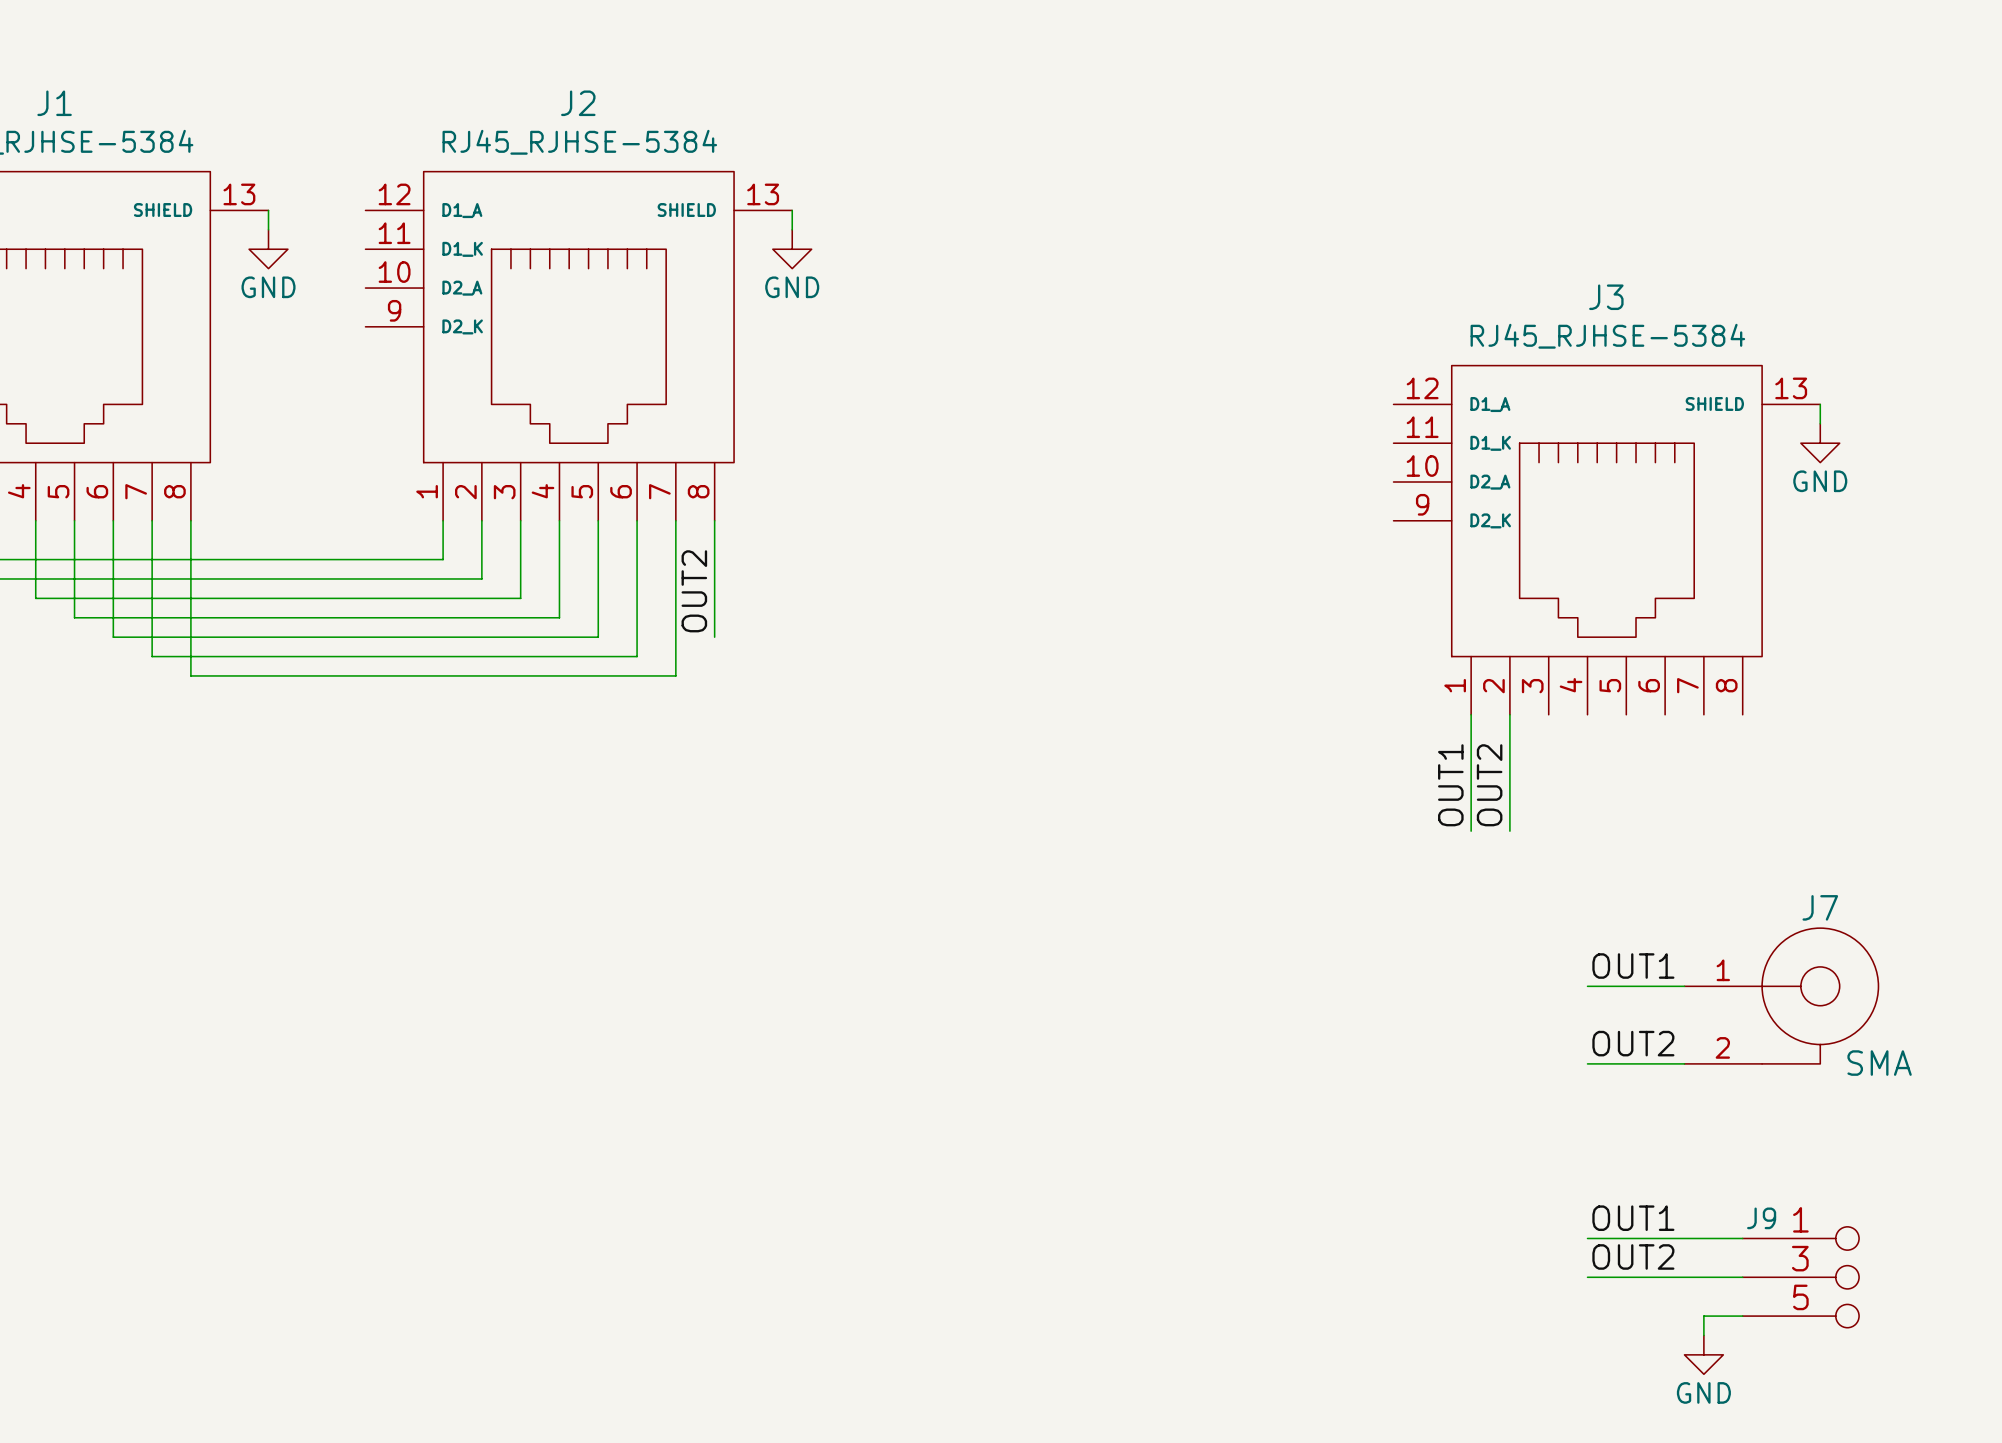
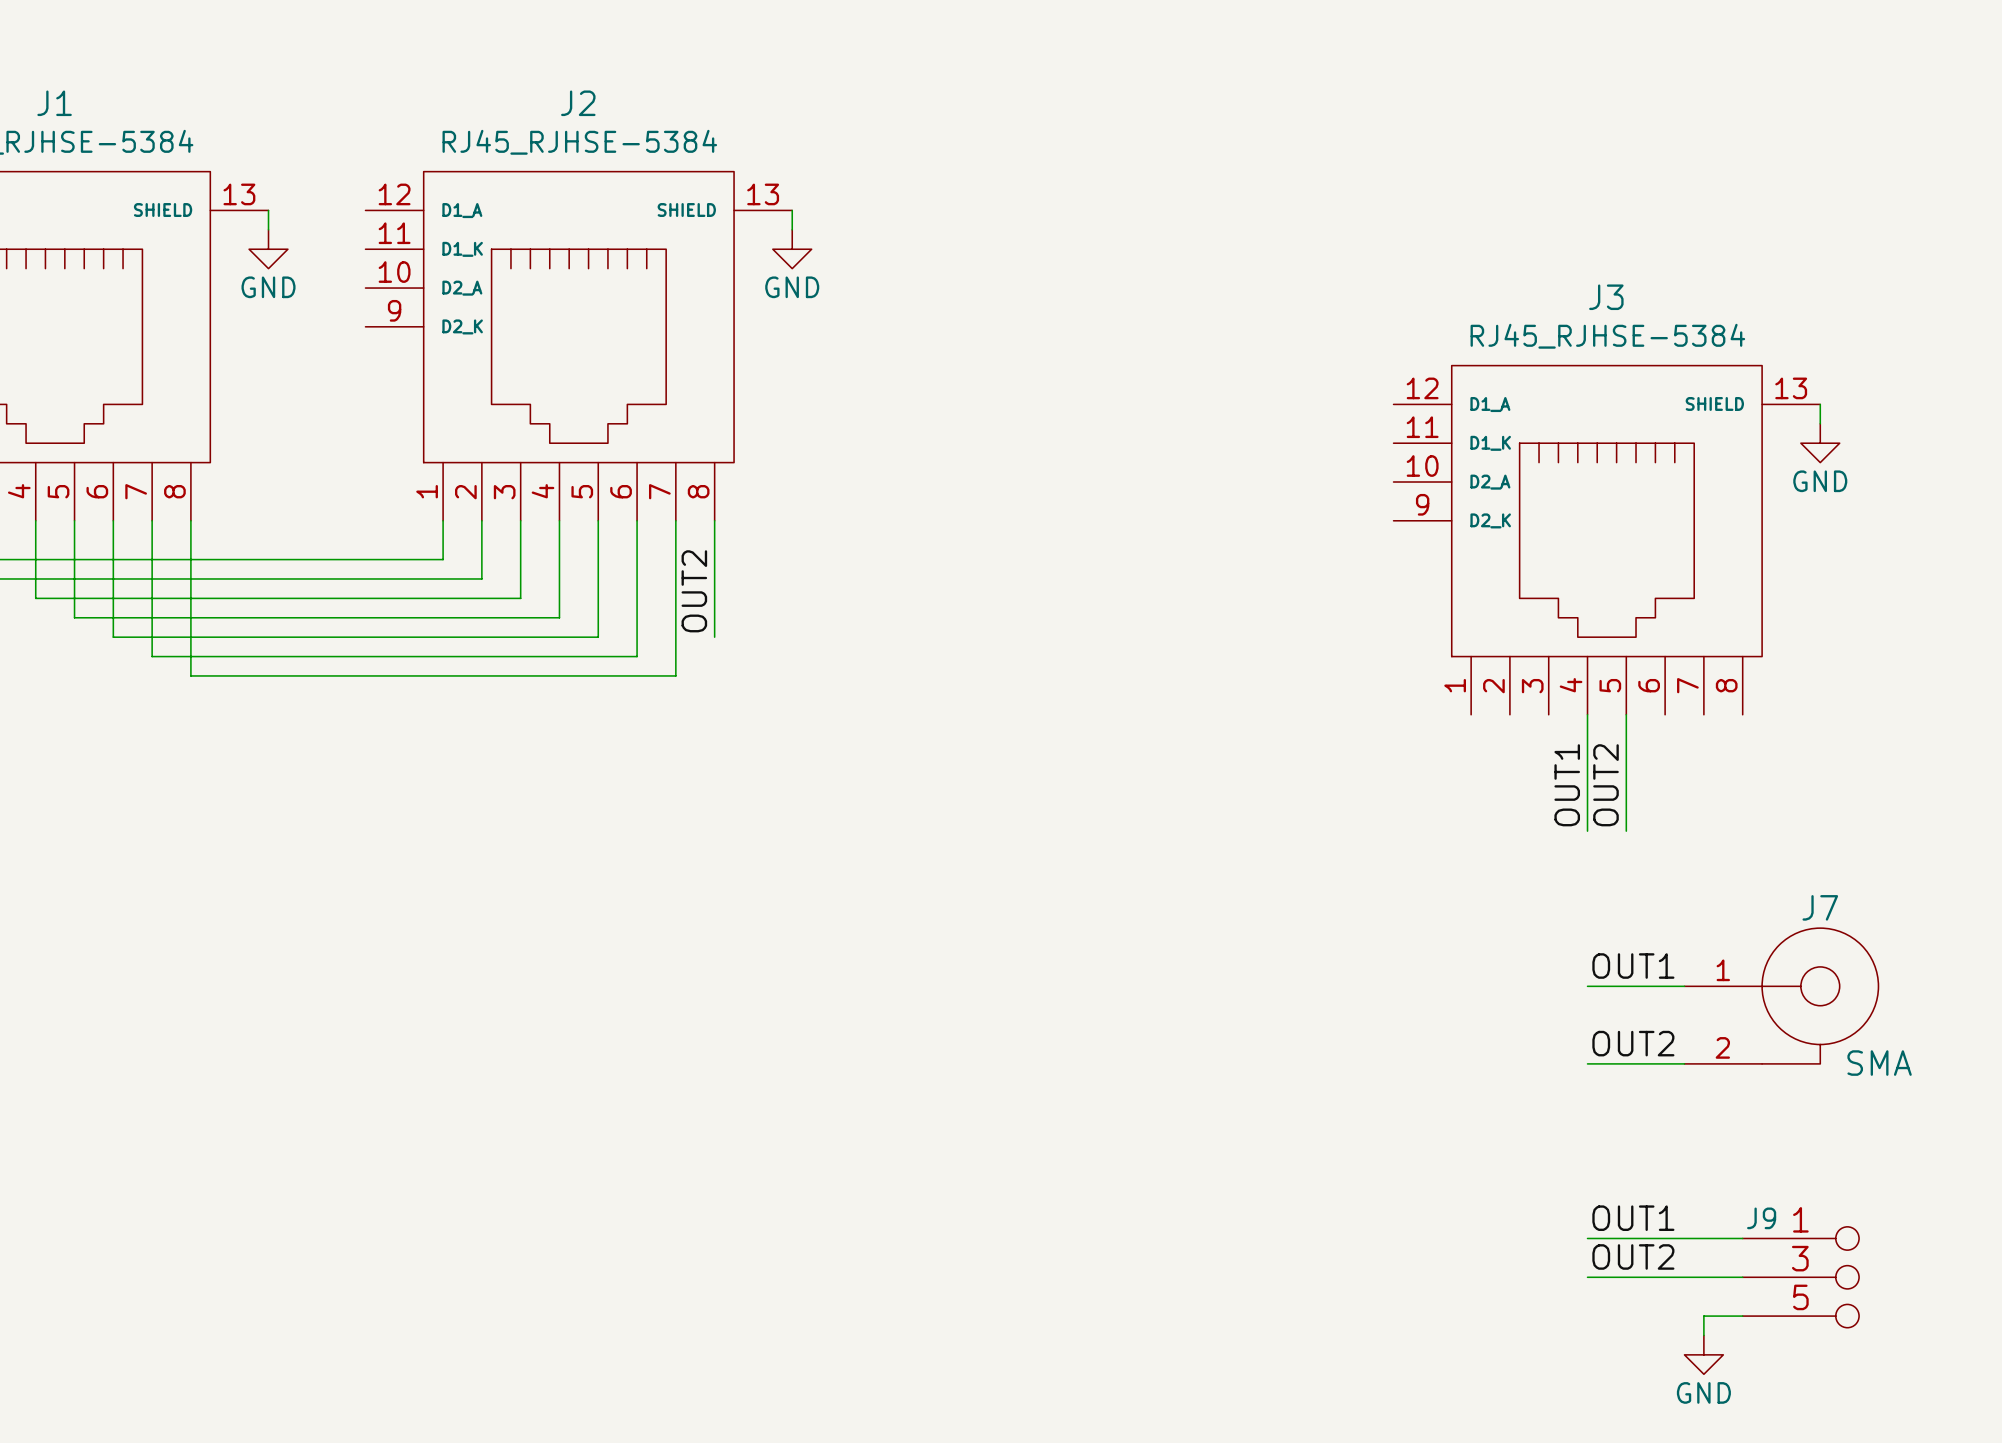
wire: (1471, 714) (1471, 831) -> (1626, 714) (1626, 831)
wire: (1509, 714) (1509, 831) -> (1587, 714) (1587, 831)
label position: OUT1 (1450, 785) -> OUT1 (1567, 785)
label position: OUT2 (1489, 785) -> OUT2 (1606, 785)

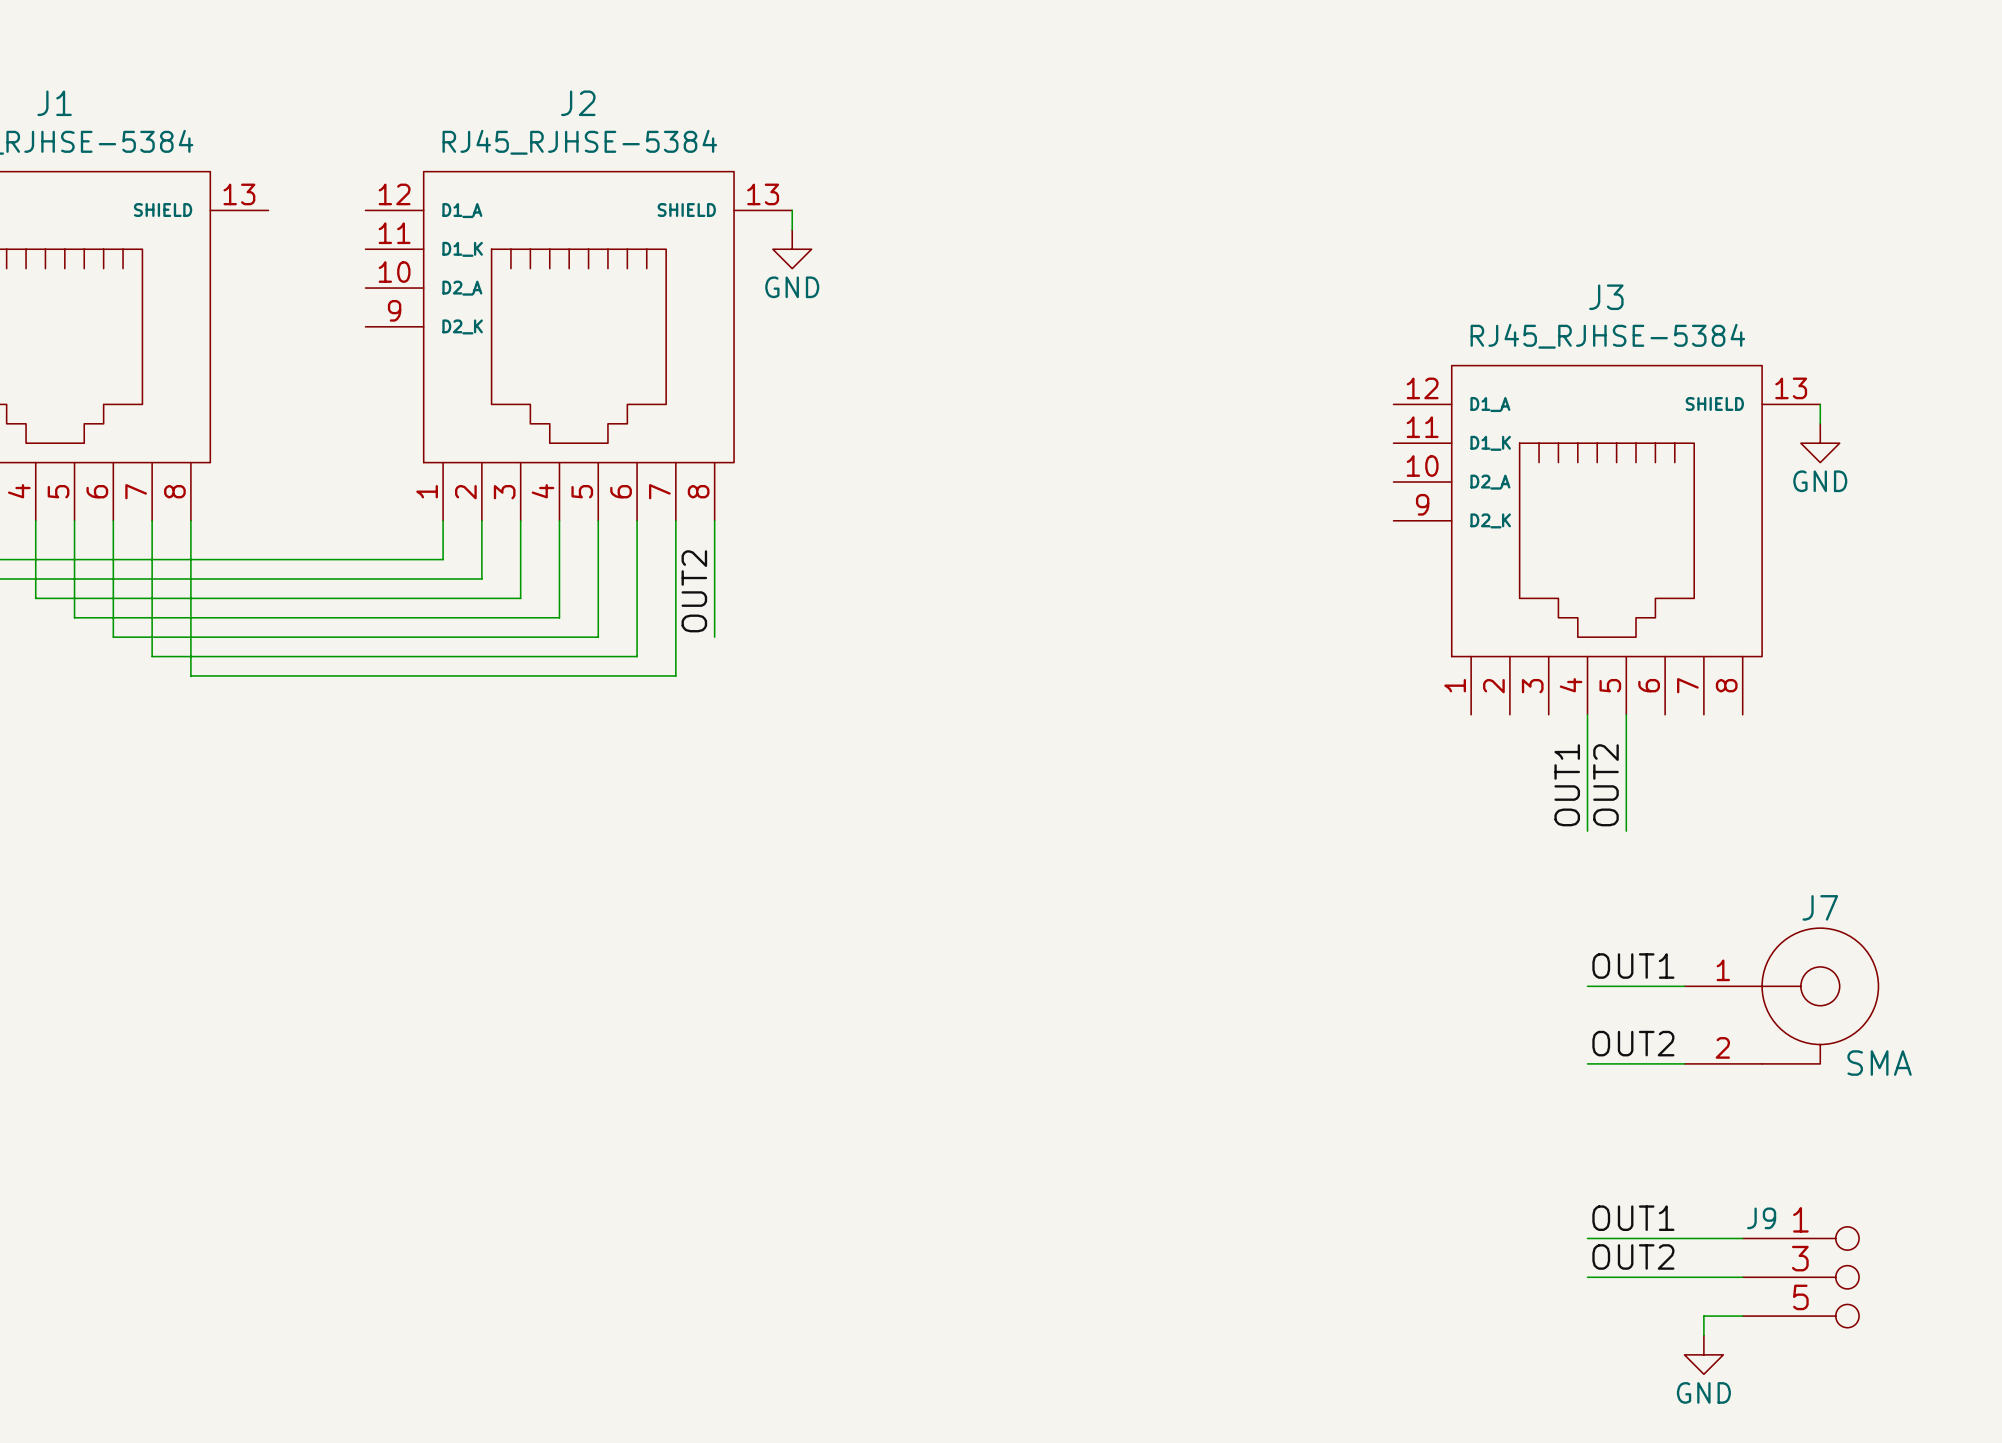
wire: (268, 210) (268, 229) -> none
power symbol: GND (268, 249) -> none

